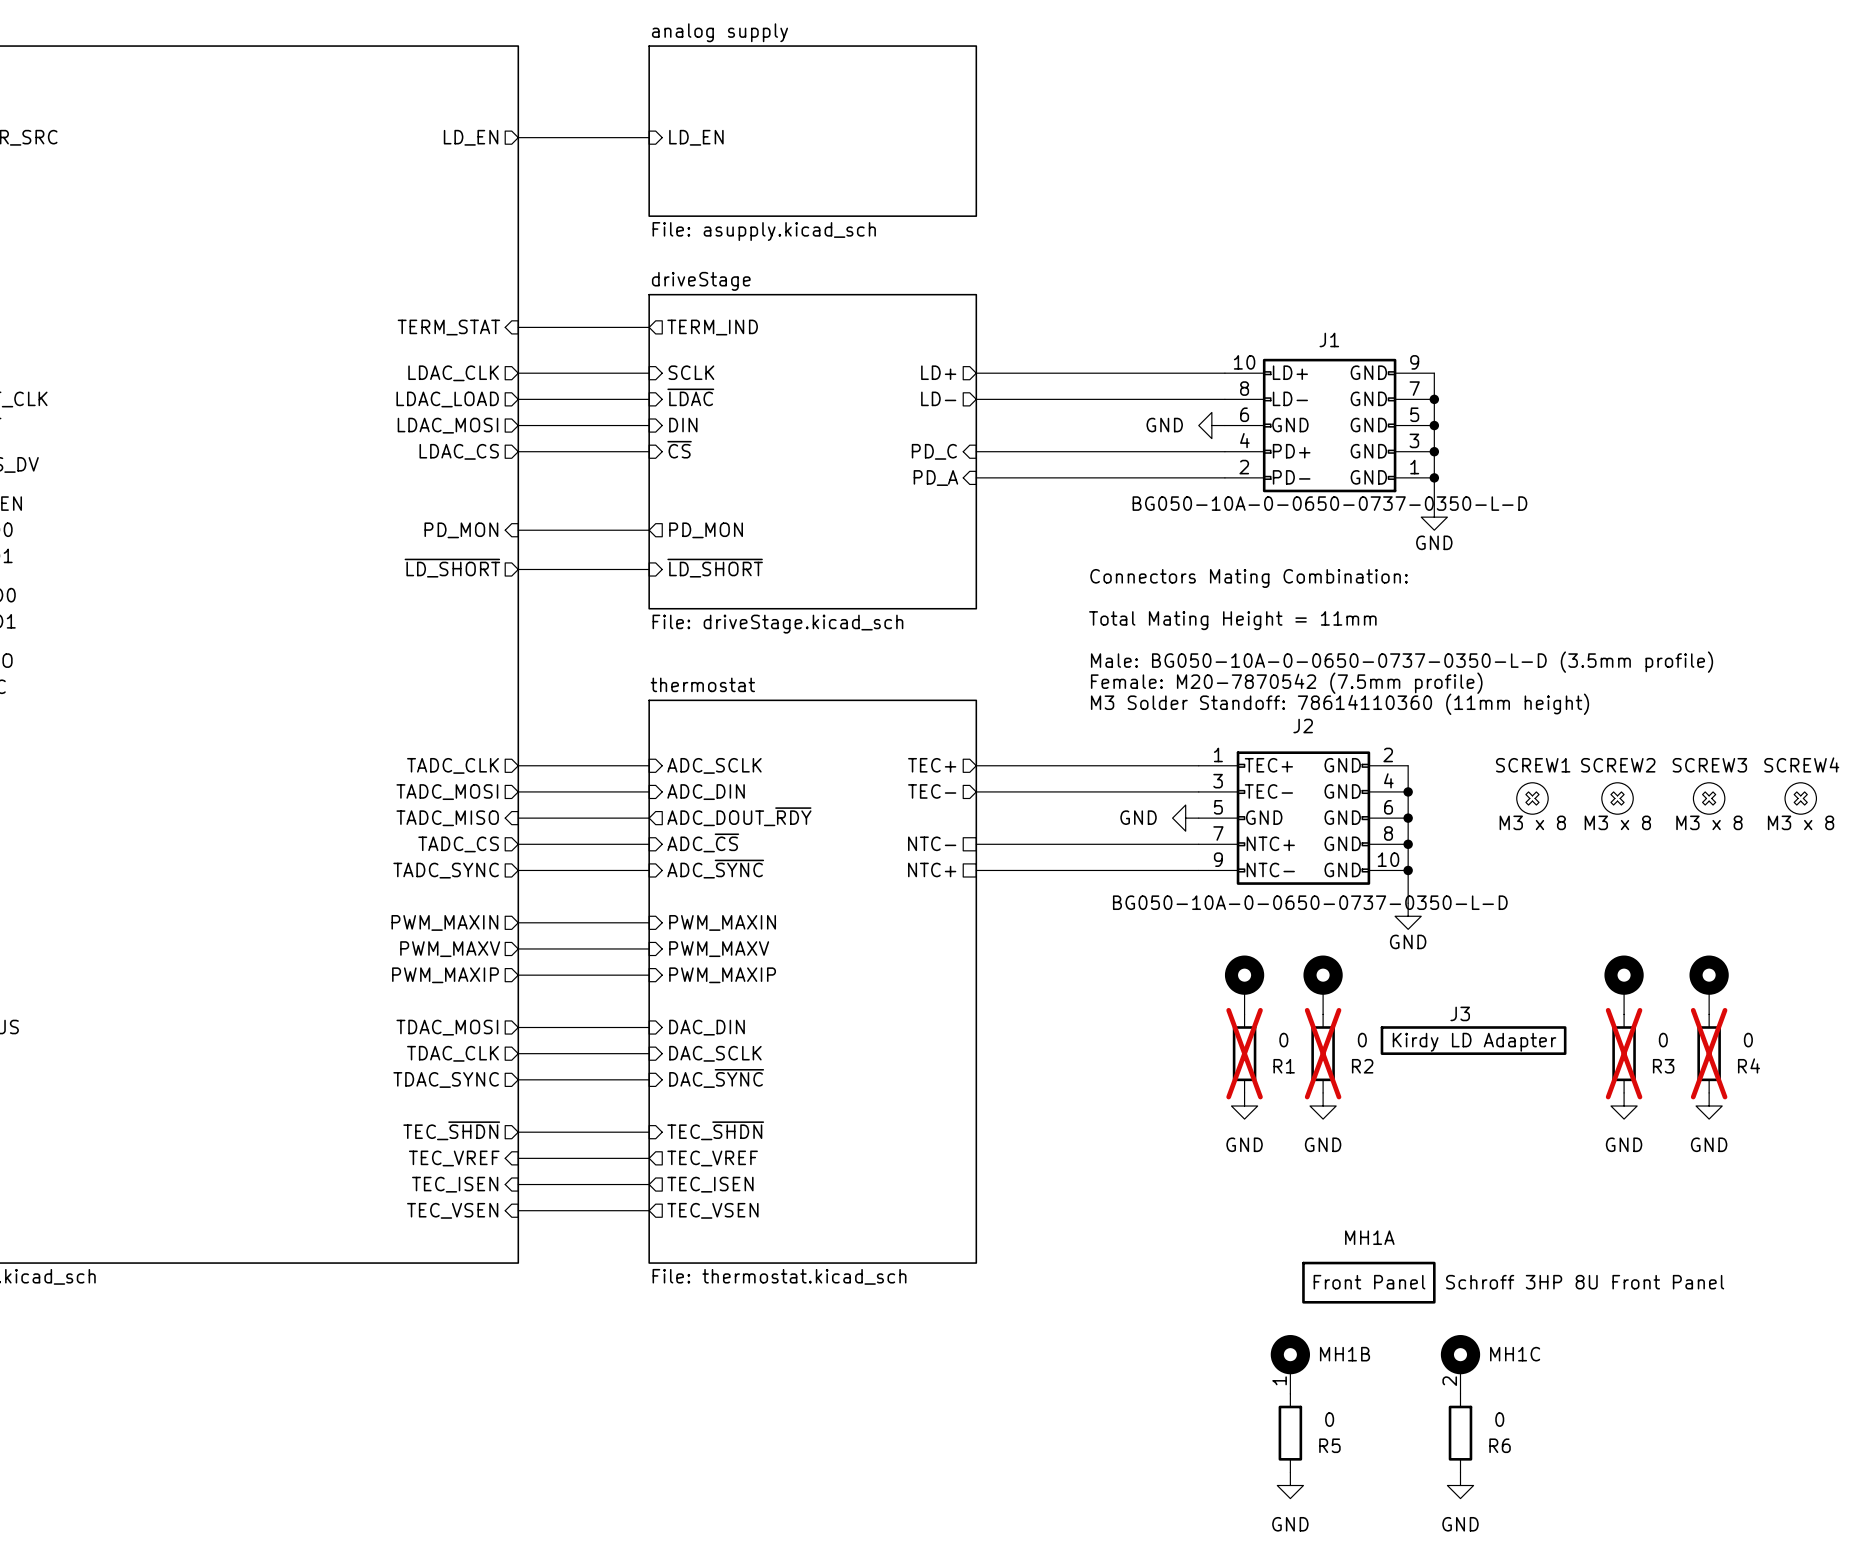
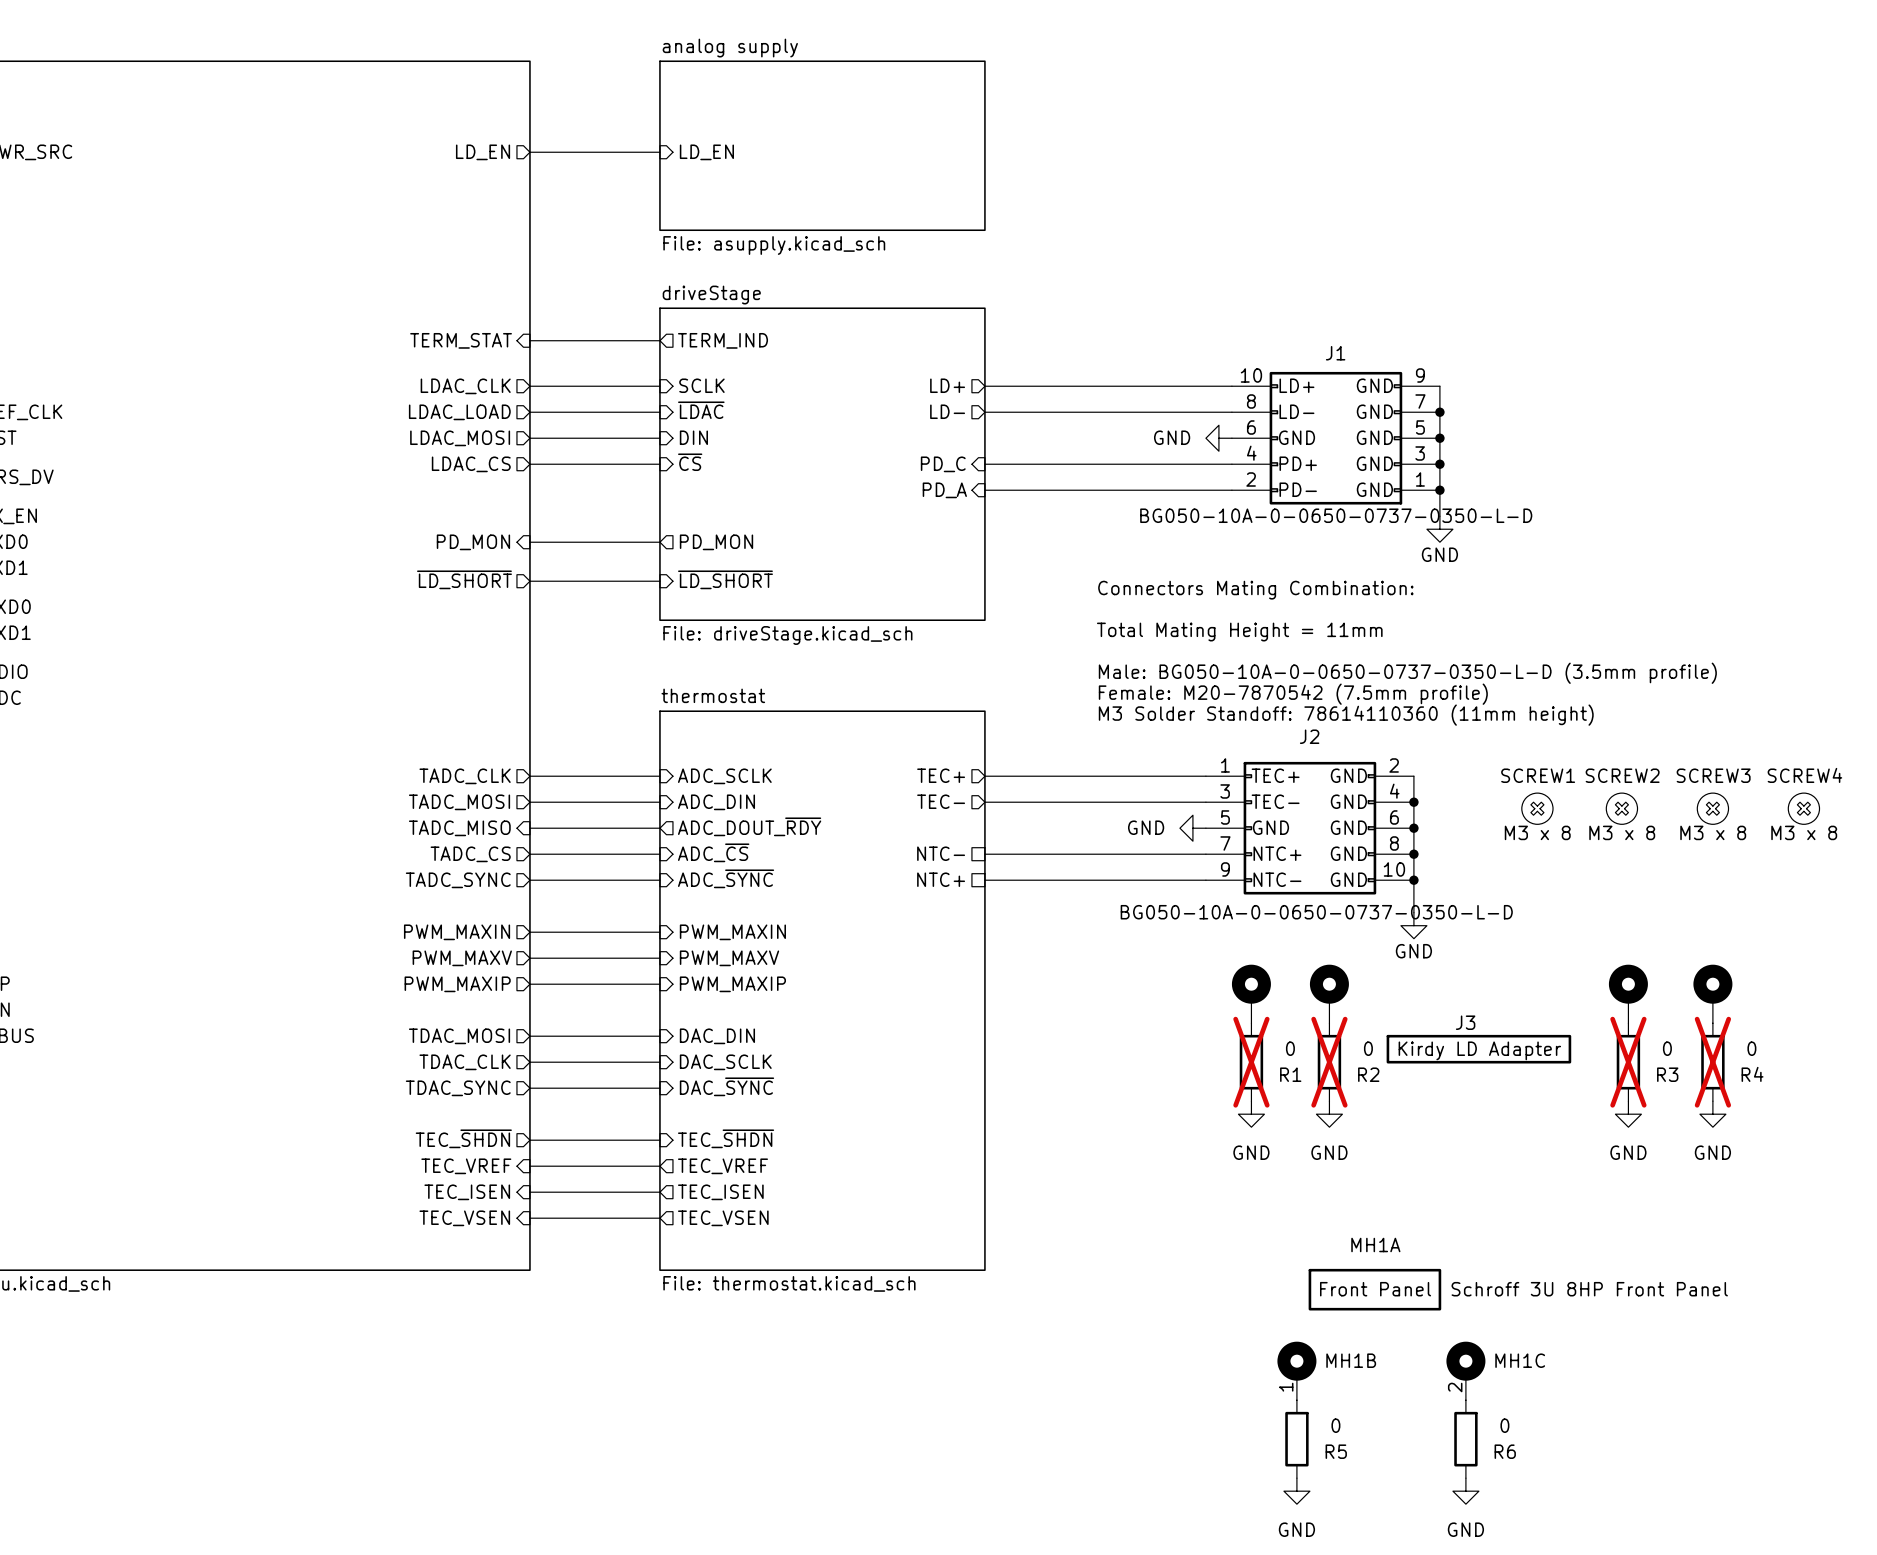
MH1A value: Schroff 3HP 8U Front Panel (1585, 1282) -> Schroff 3U 8HP Front Panel (1589, 1289)

